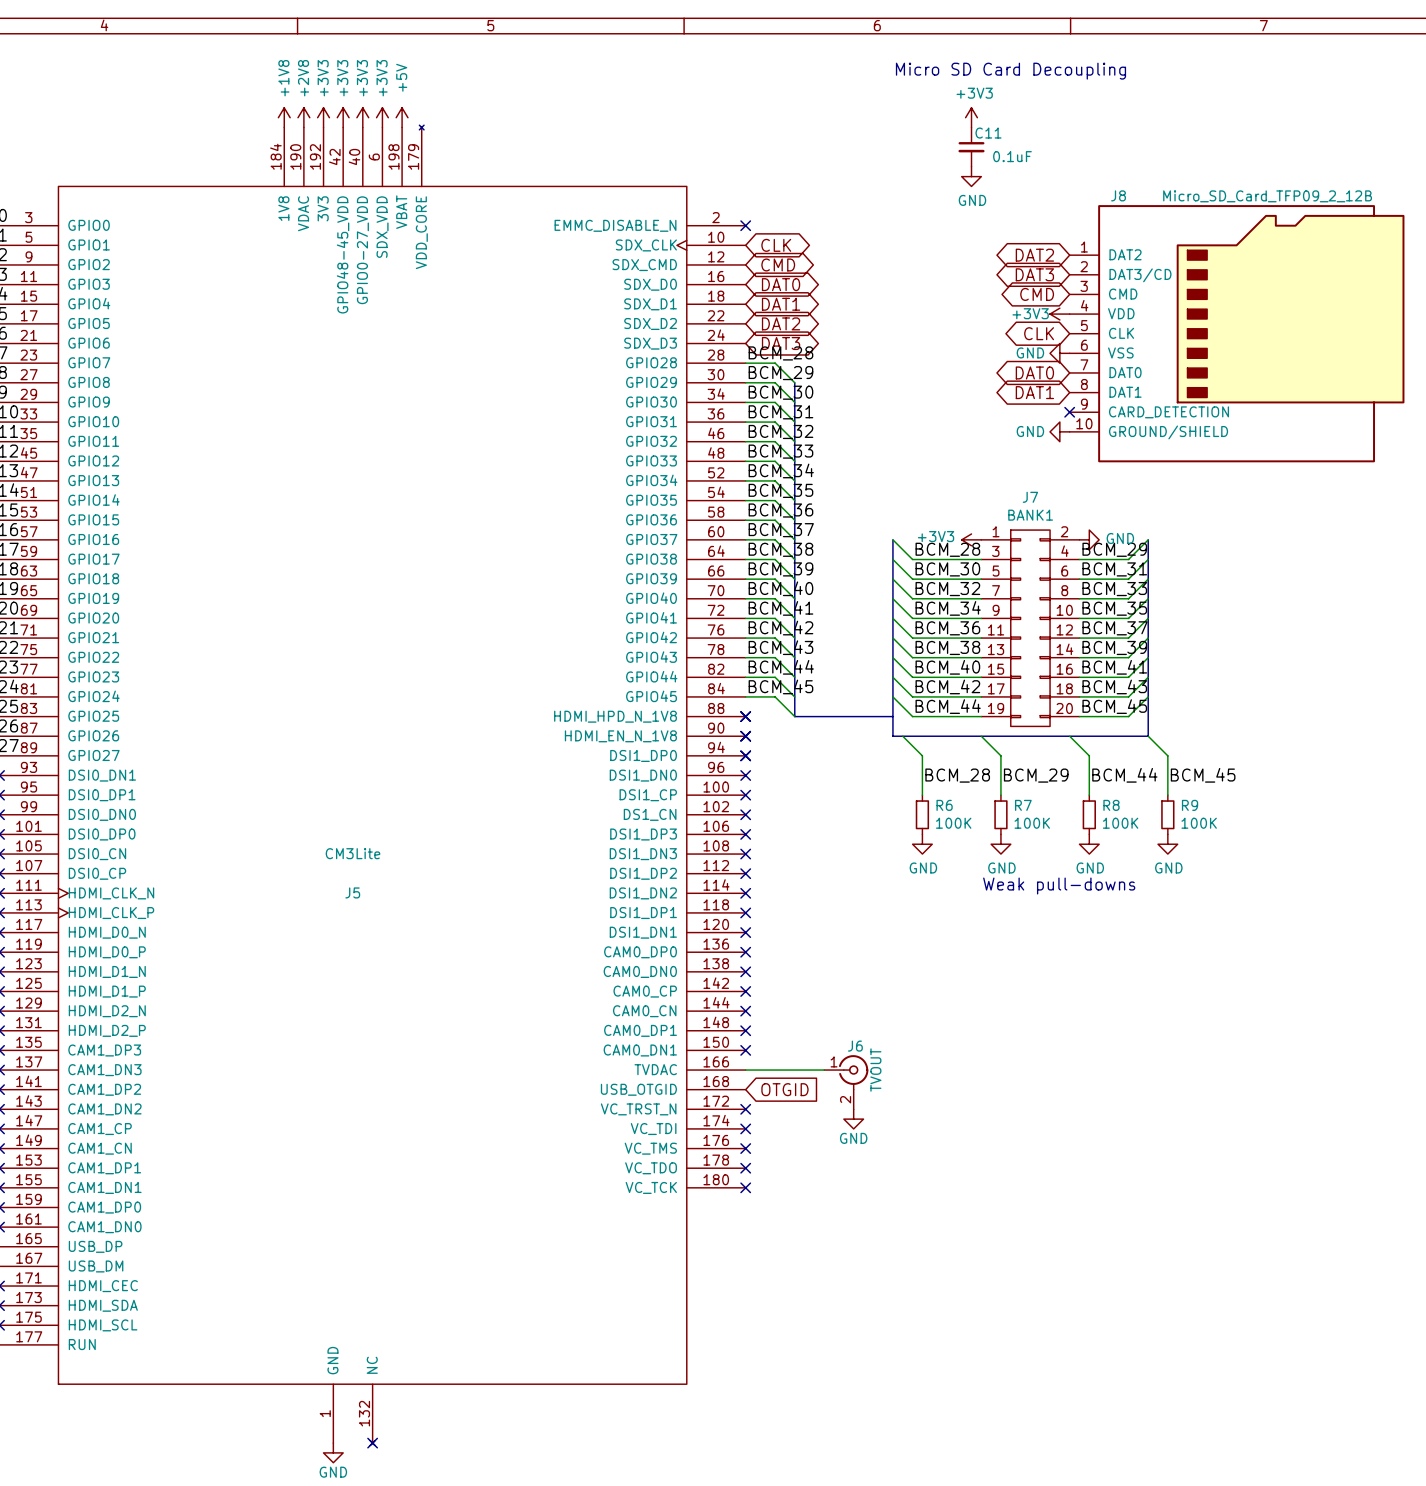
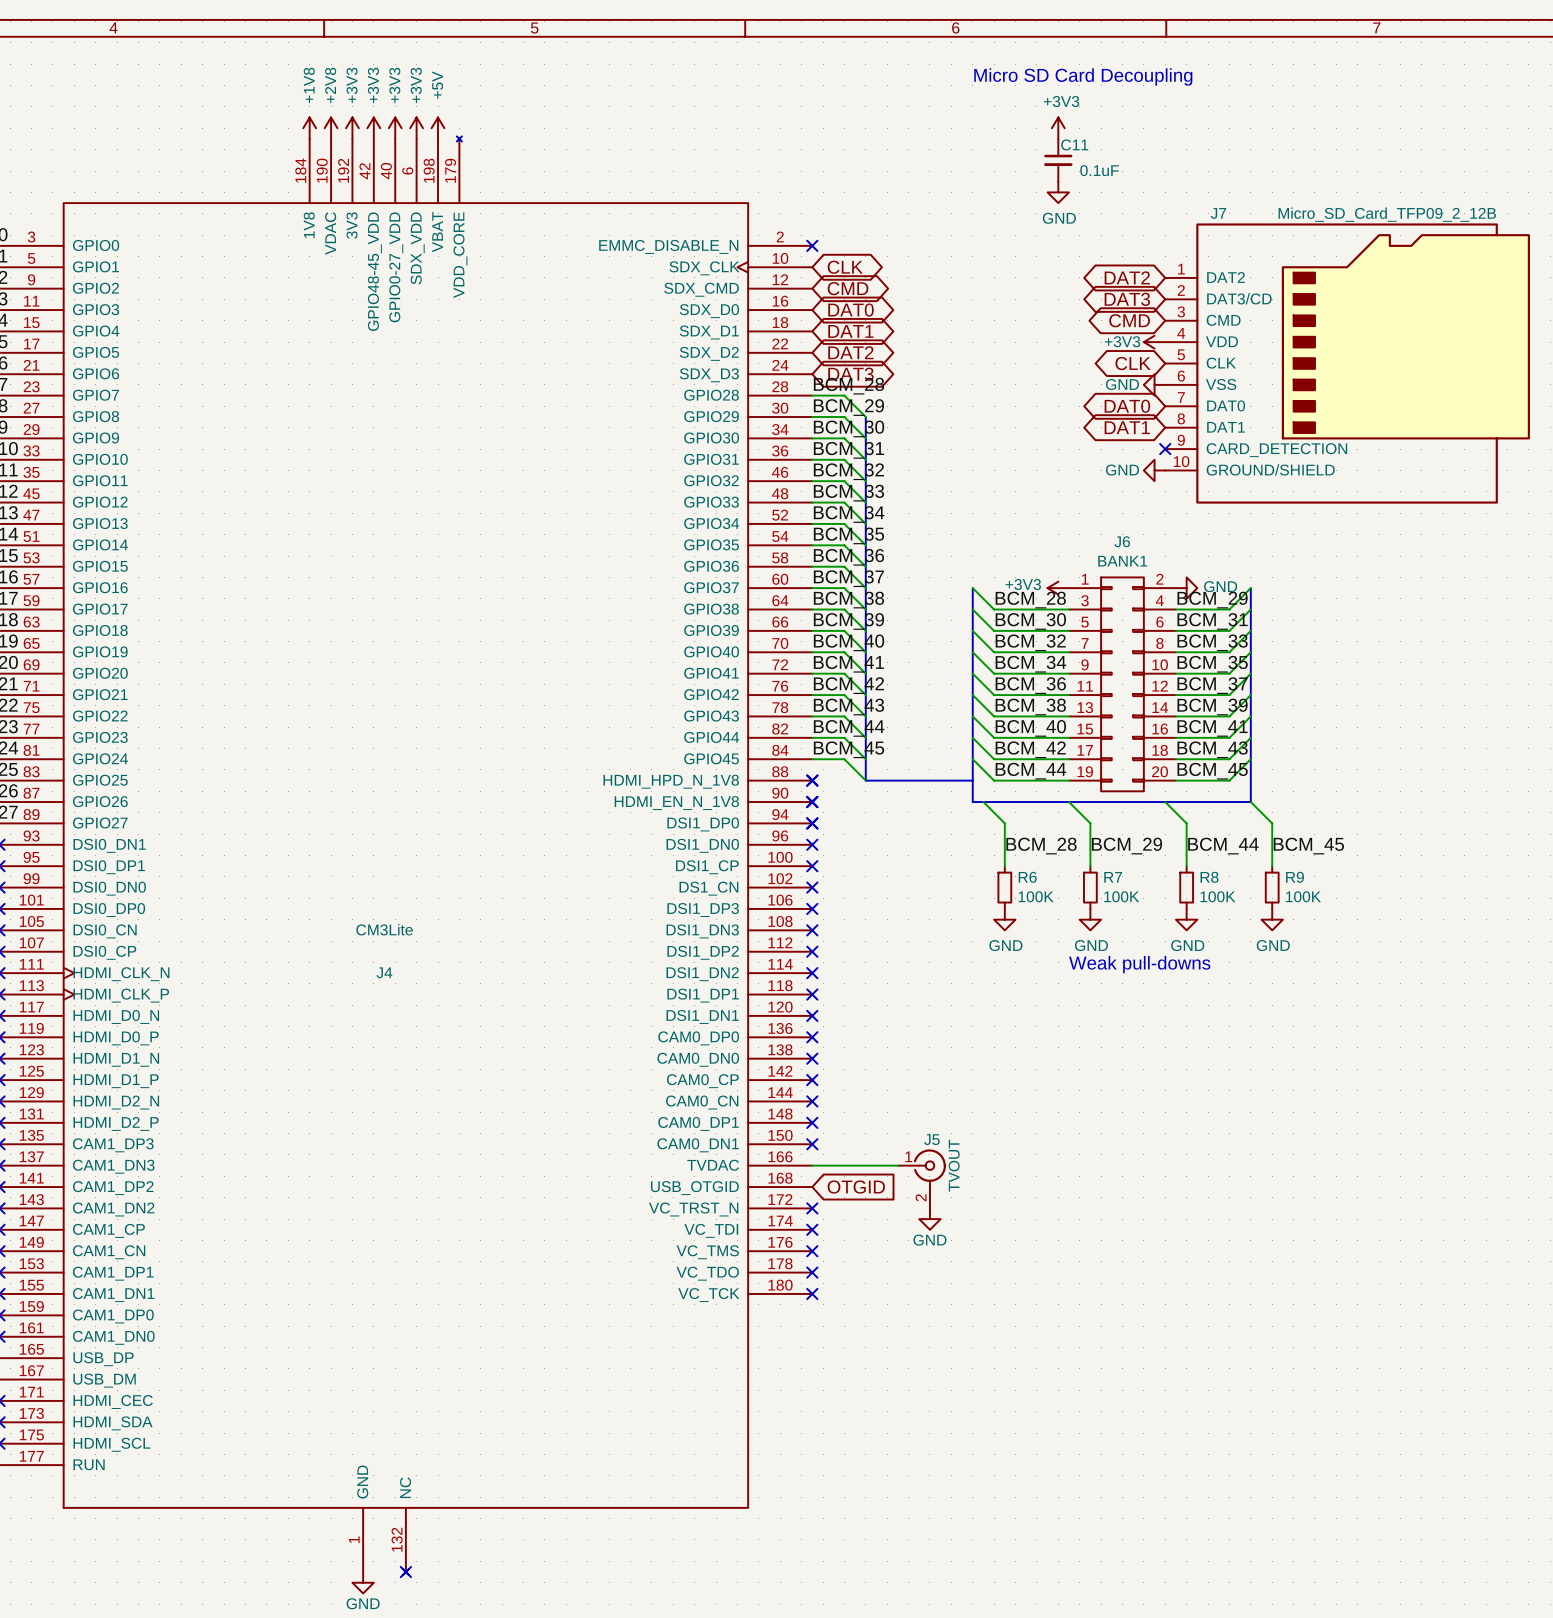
J8 name: J8 (1118, 195) -> J7 (1218, 213)
J7 name: J7 (1030, 497) -> J6 (1122, 541)
J5 name: J5 (352, 892) -> J4 (384, 972)
J6 name: J6 (855, 1046) -> J5 (931, 1139)

